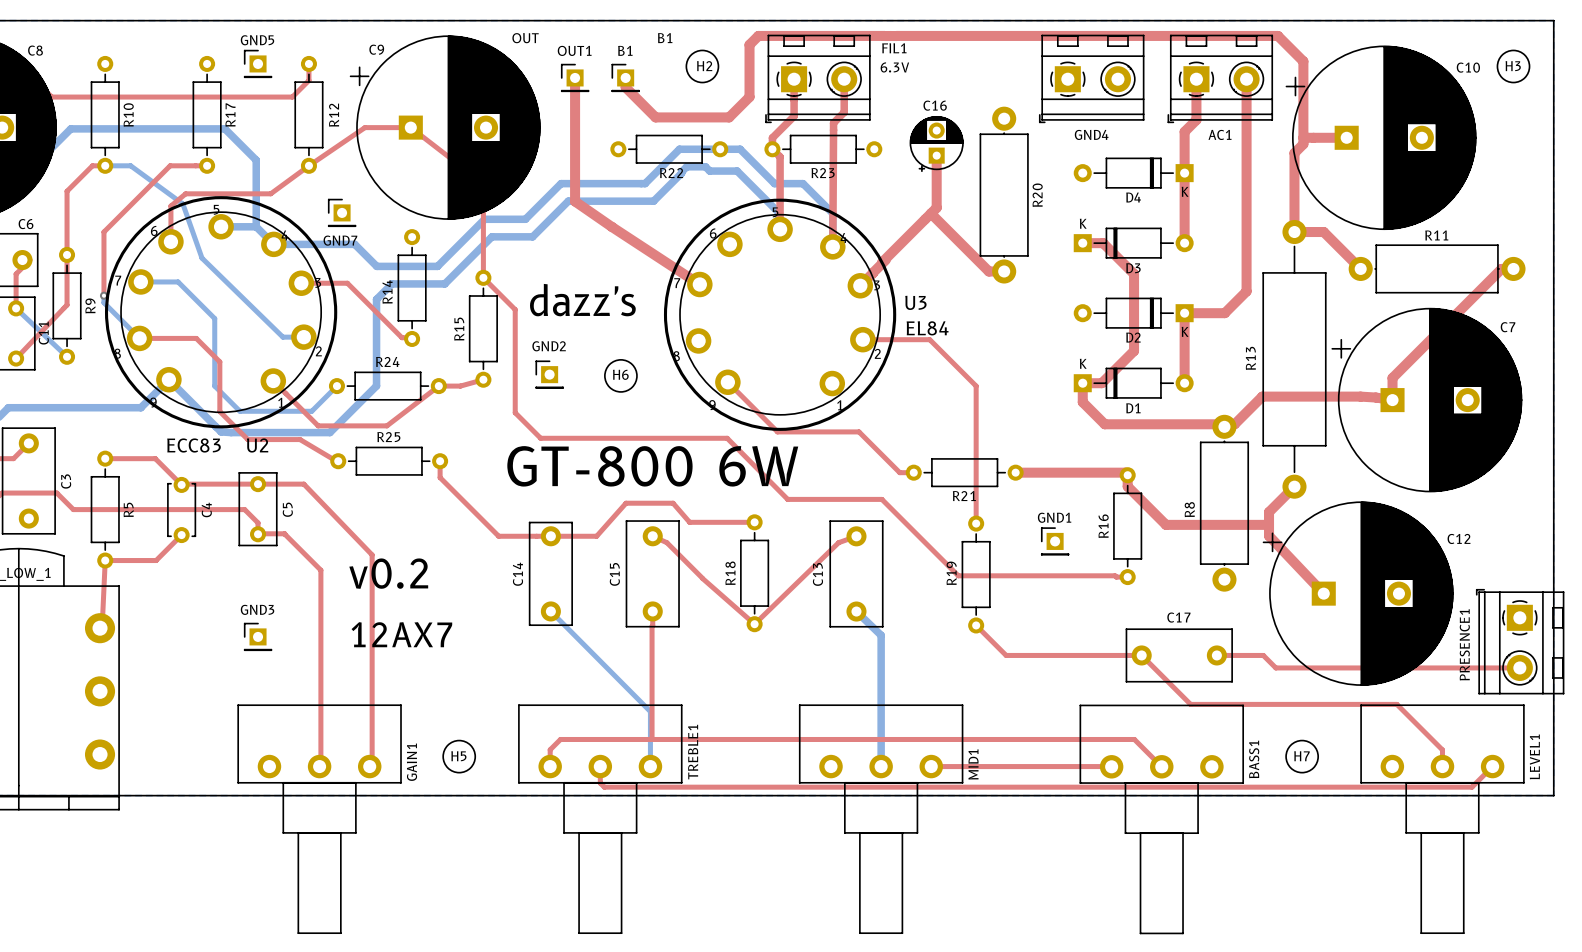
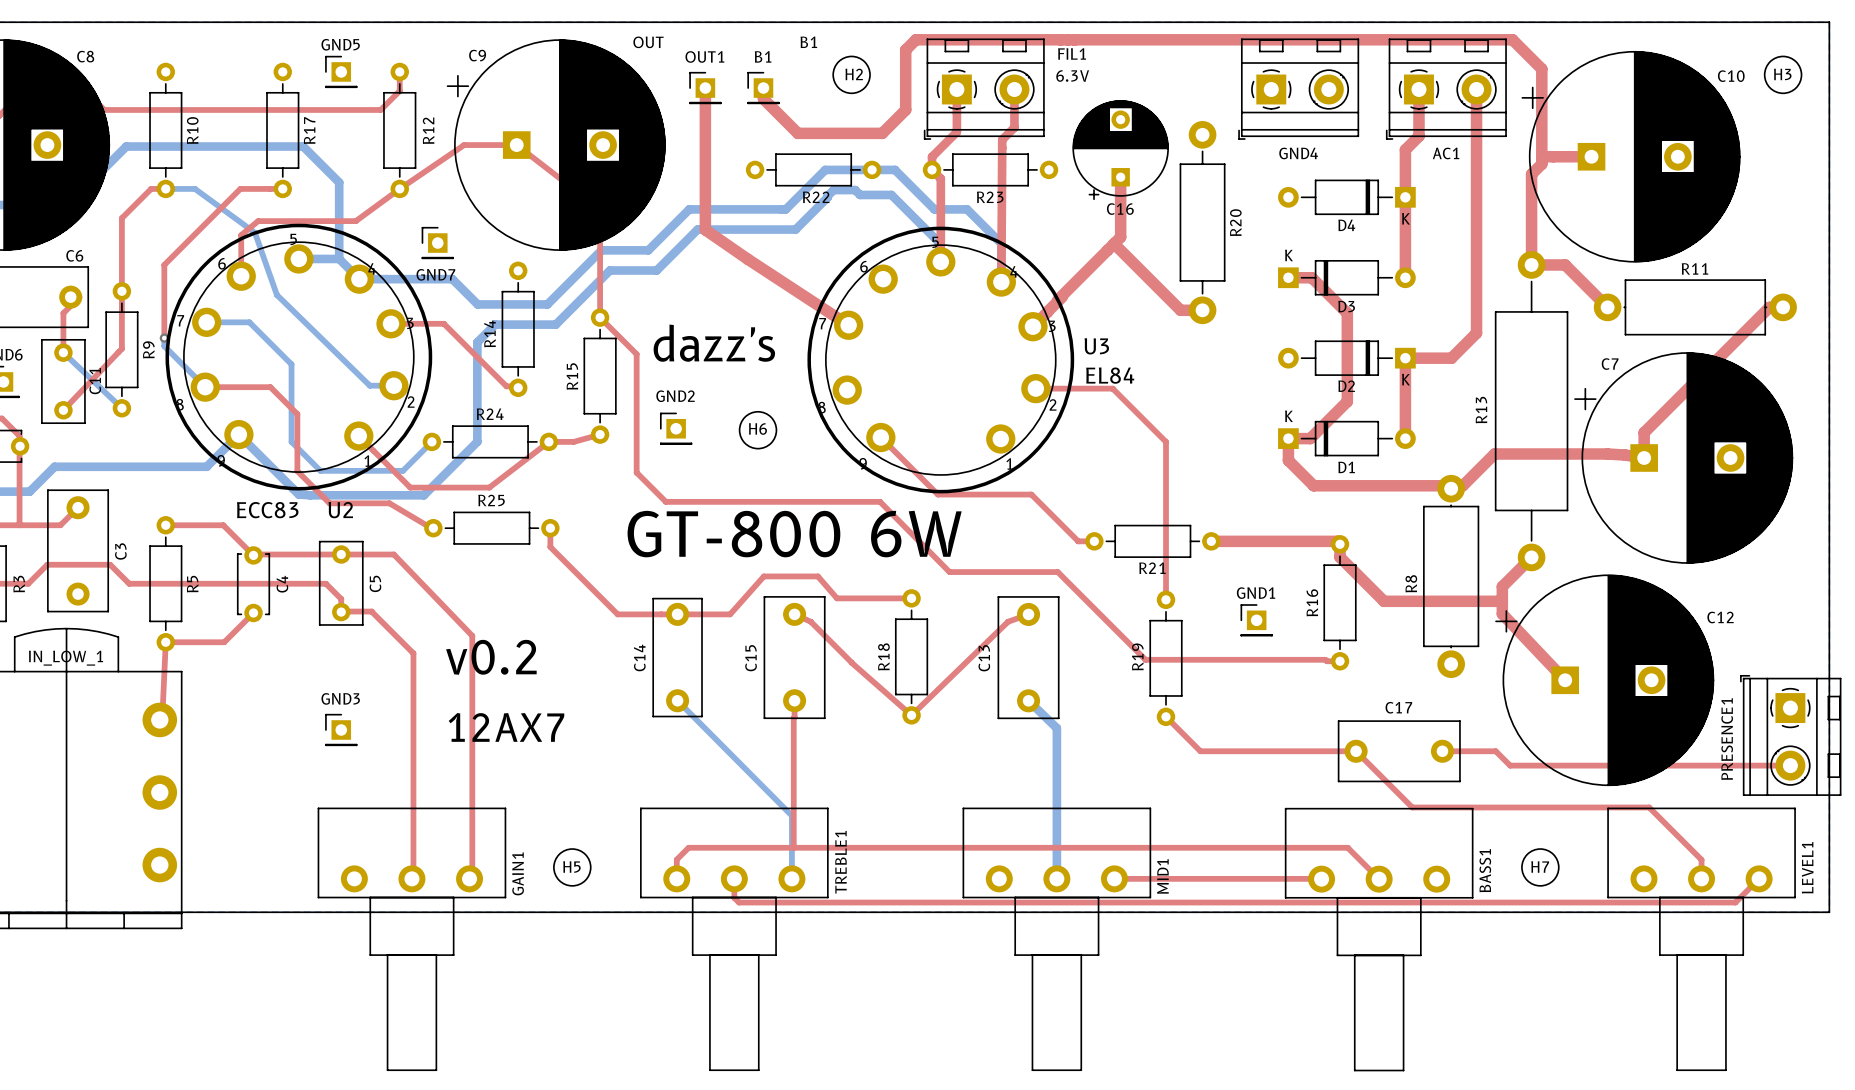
C16 name position: C16 (935, 105) -> C16 (1120, 209)
R20 footprint: [979, 106, 1029, 284] -> [1179, 121, 1226, 325]
C16 footprint: [909, 116, 964, 172] -> [1072, 100, 1169, 200]
C7 name position: C7 (1508, 327) -> C7 (1610, 364)

